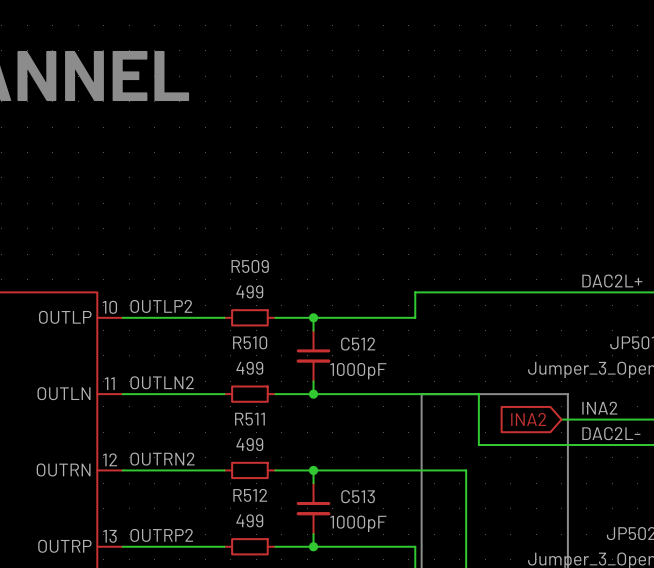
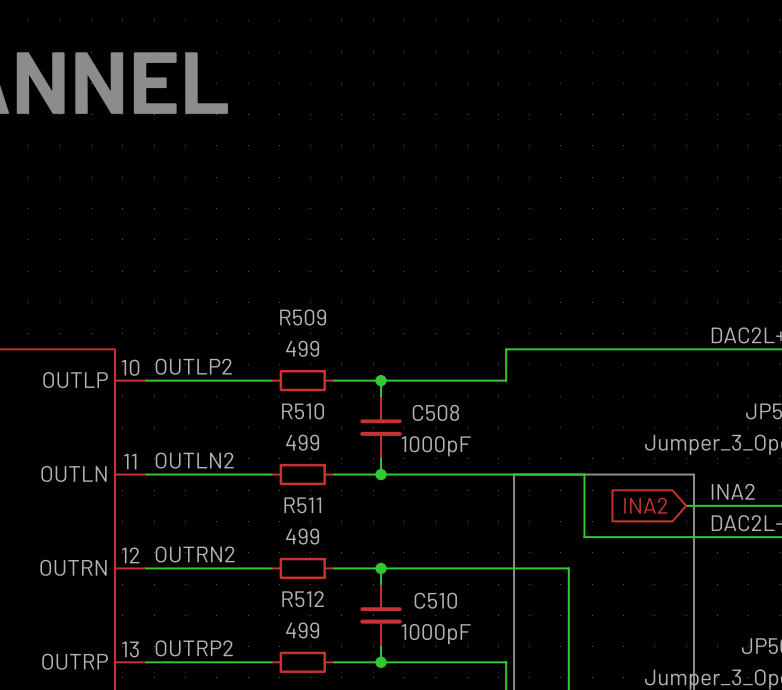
C512 name: C512 (358, 344) -> C508 (435, 412)
C513 name: C513 (358, 496) -> C510 (435, 600)

